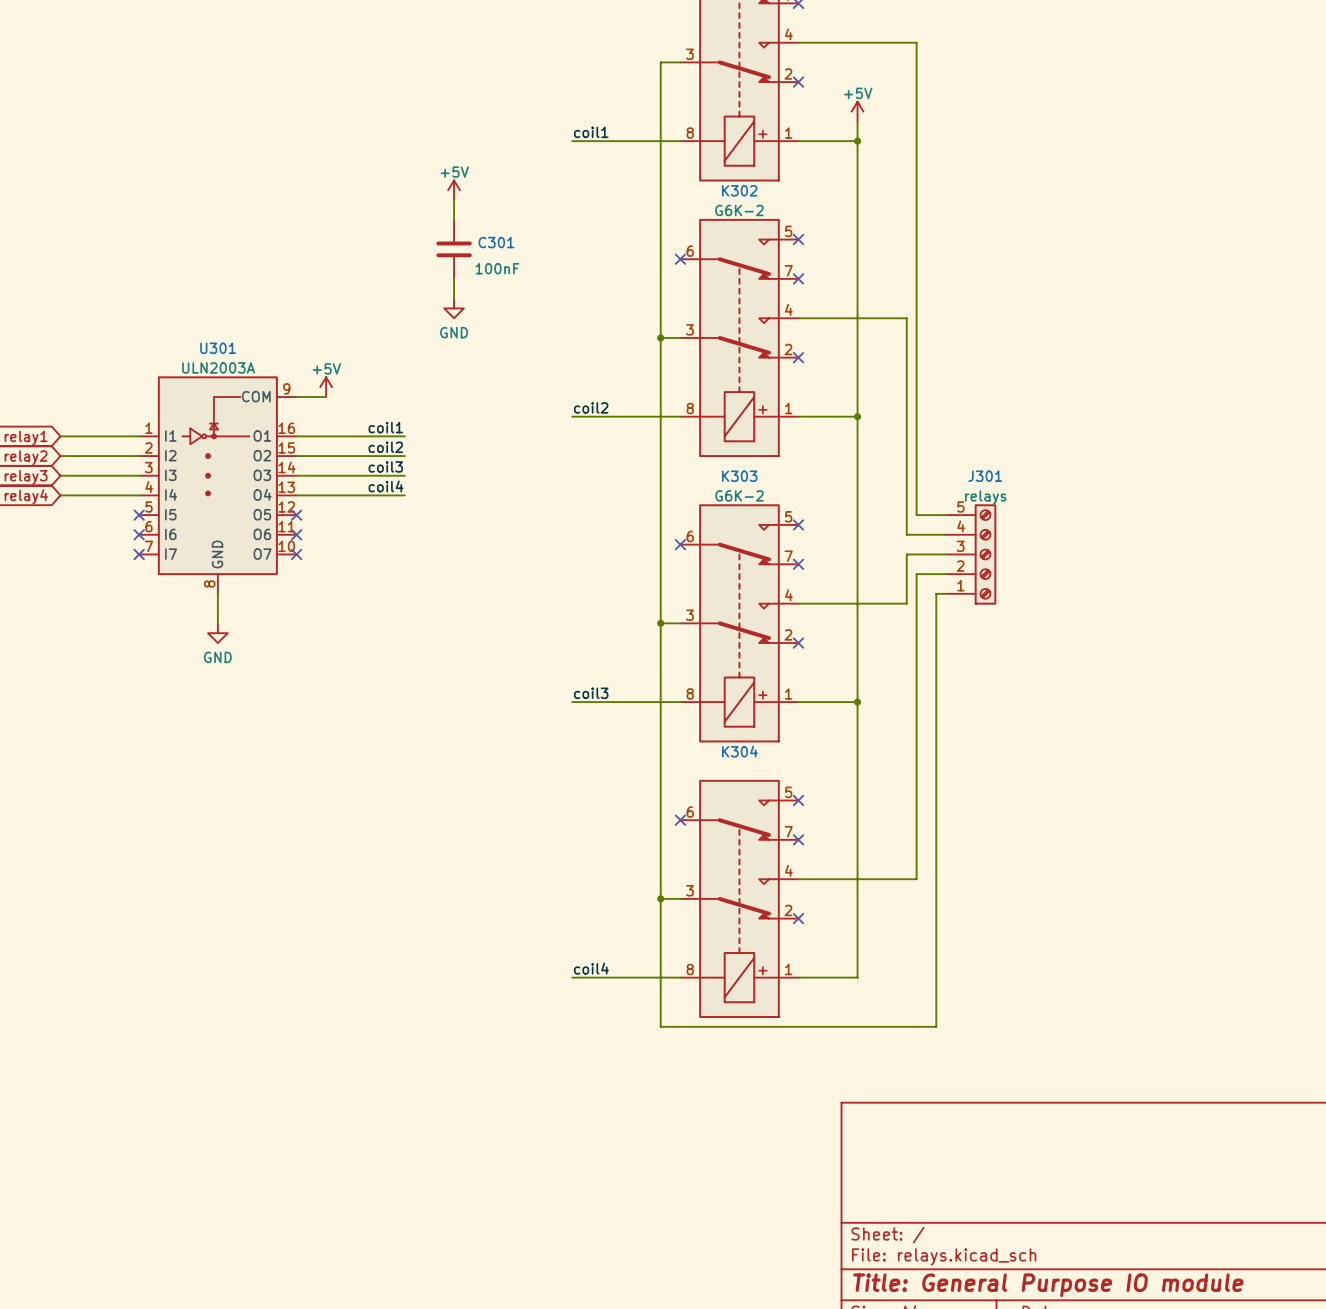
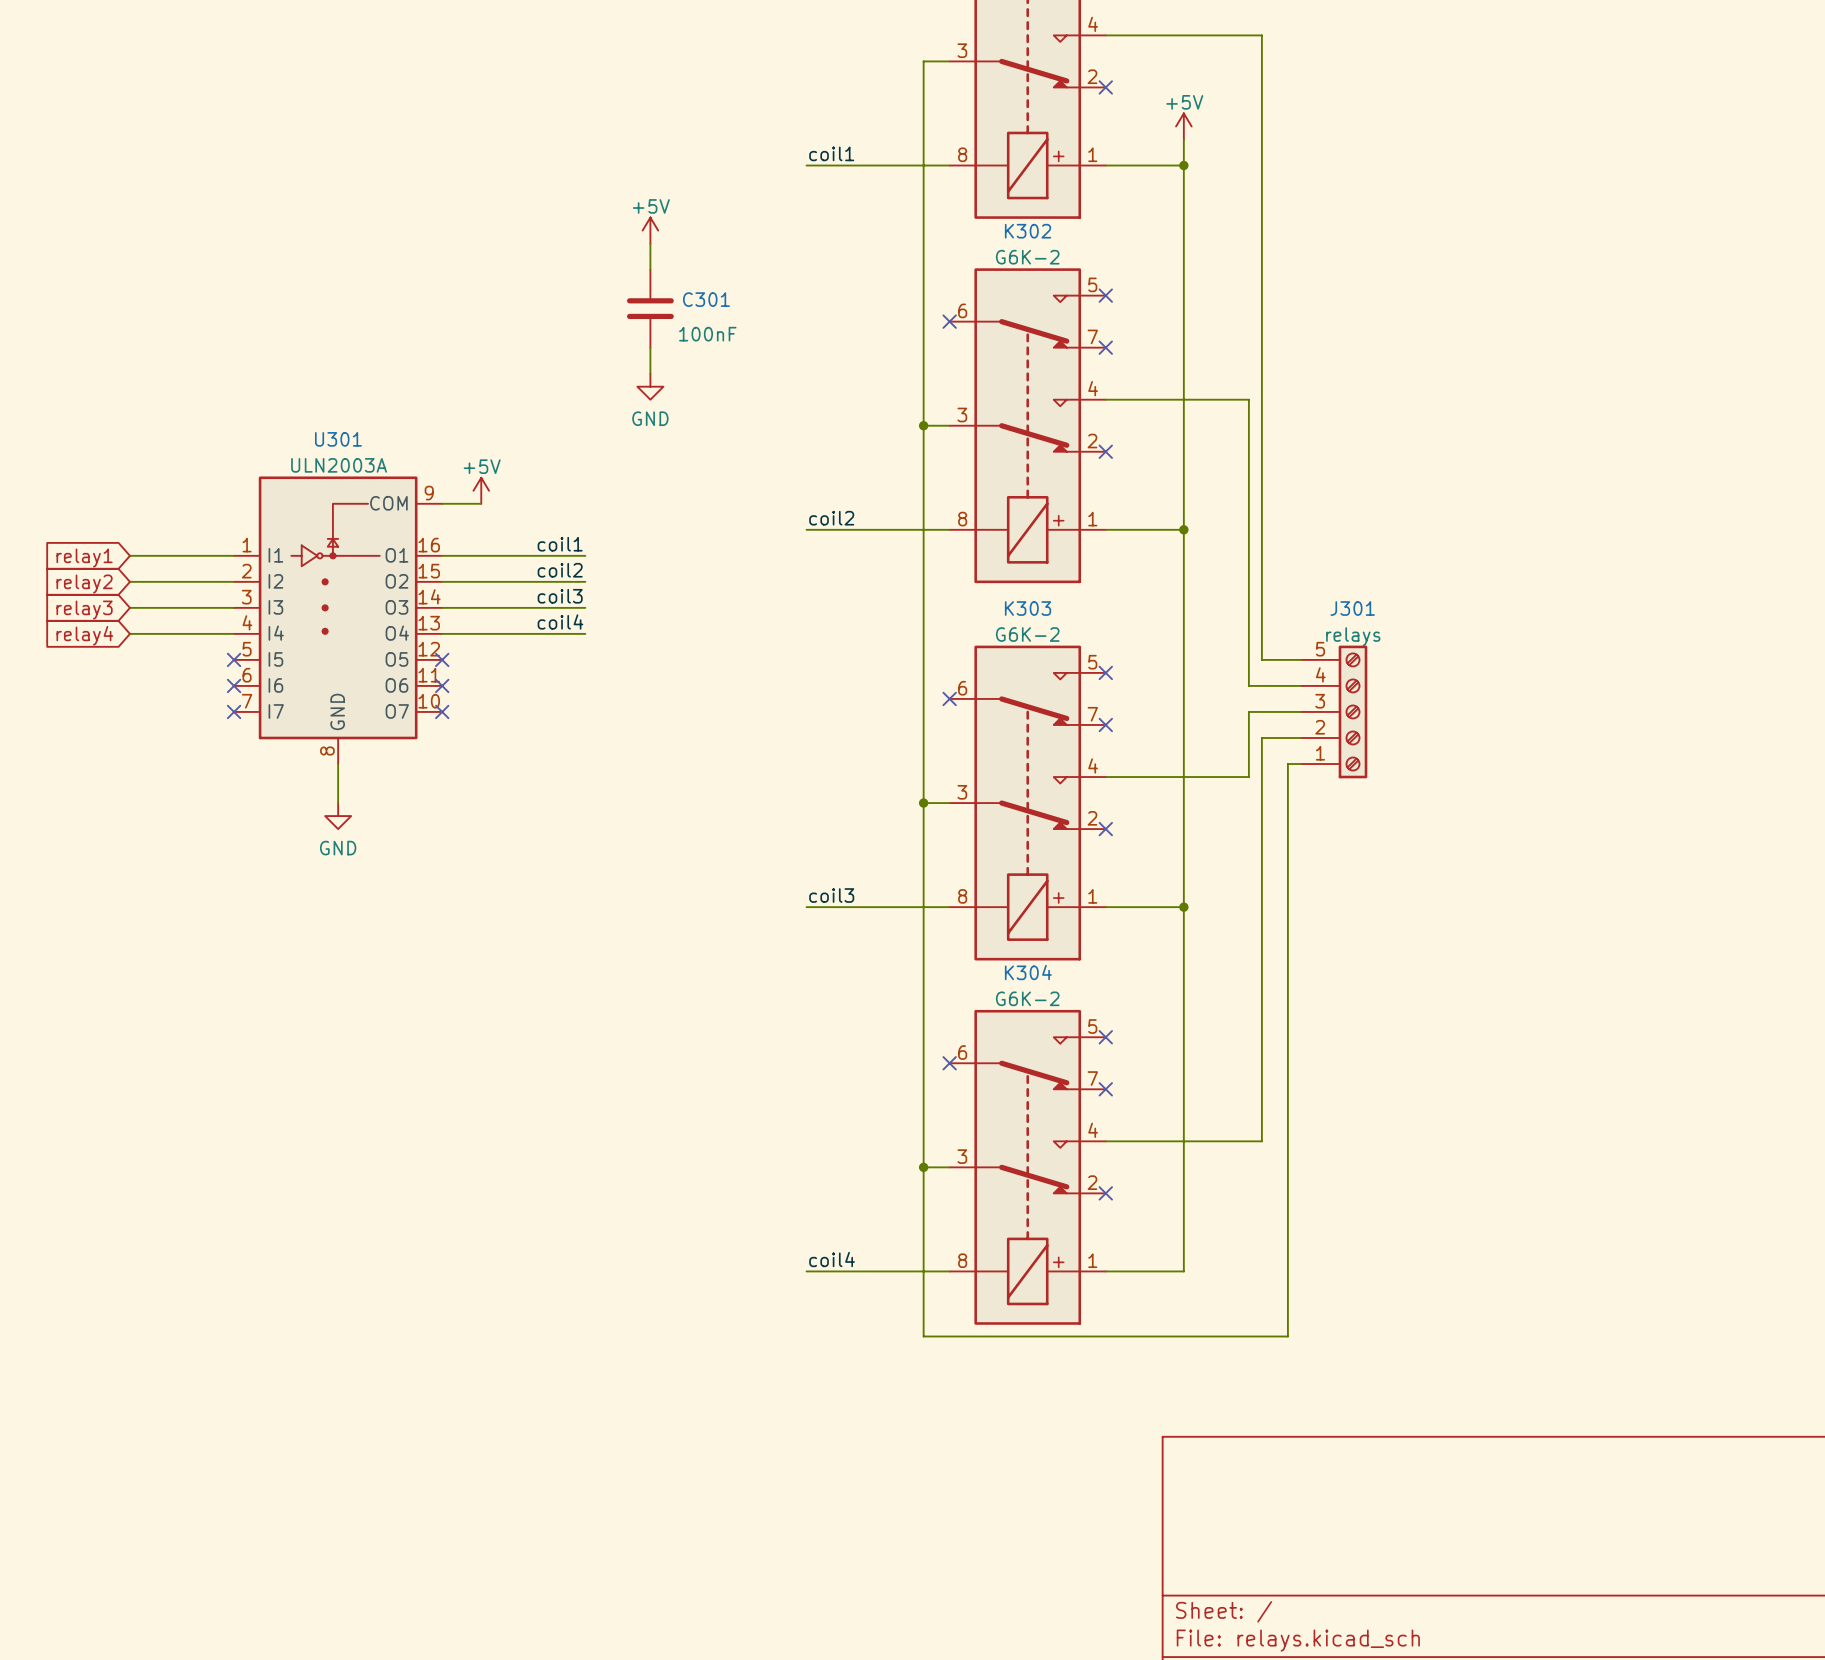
K304 value: none -> G6K-2 (1027, 998)

